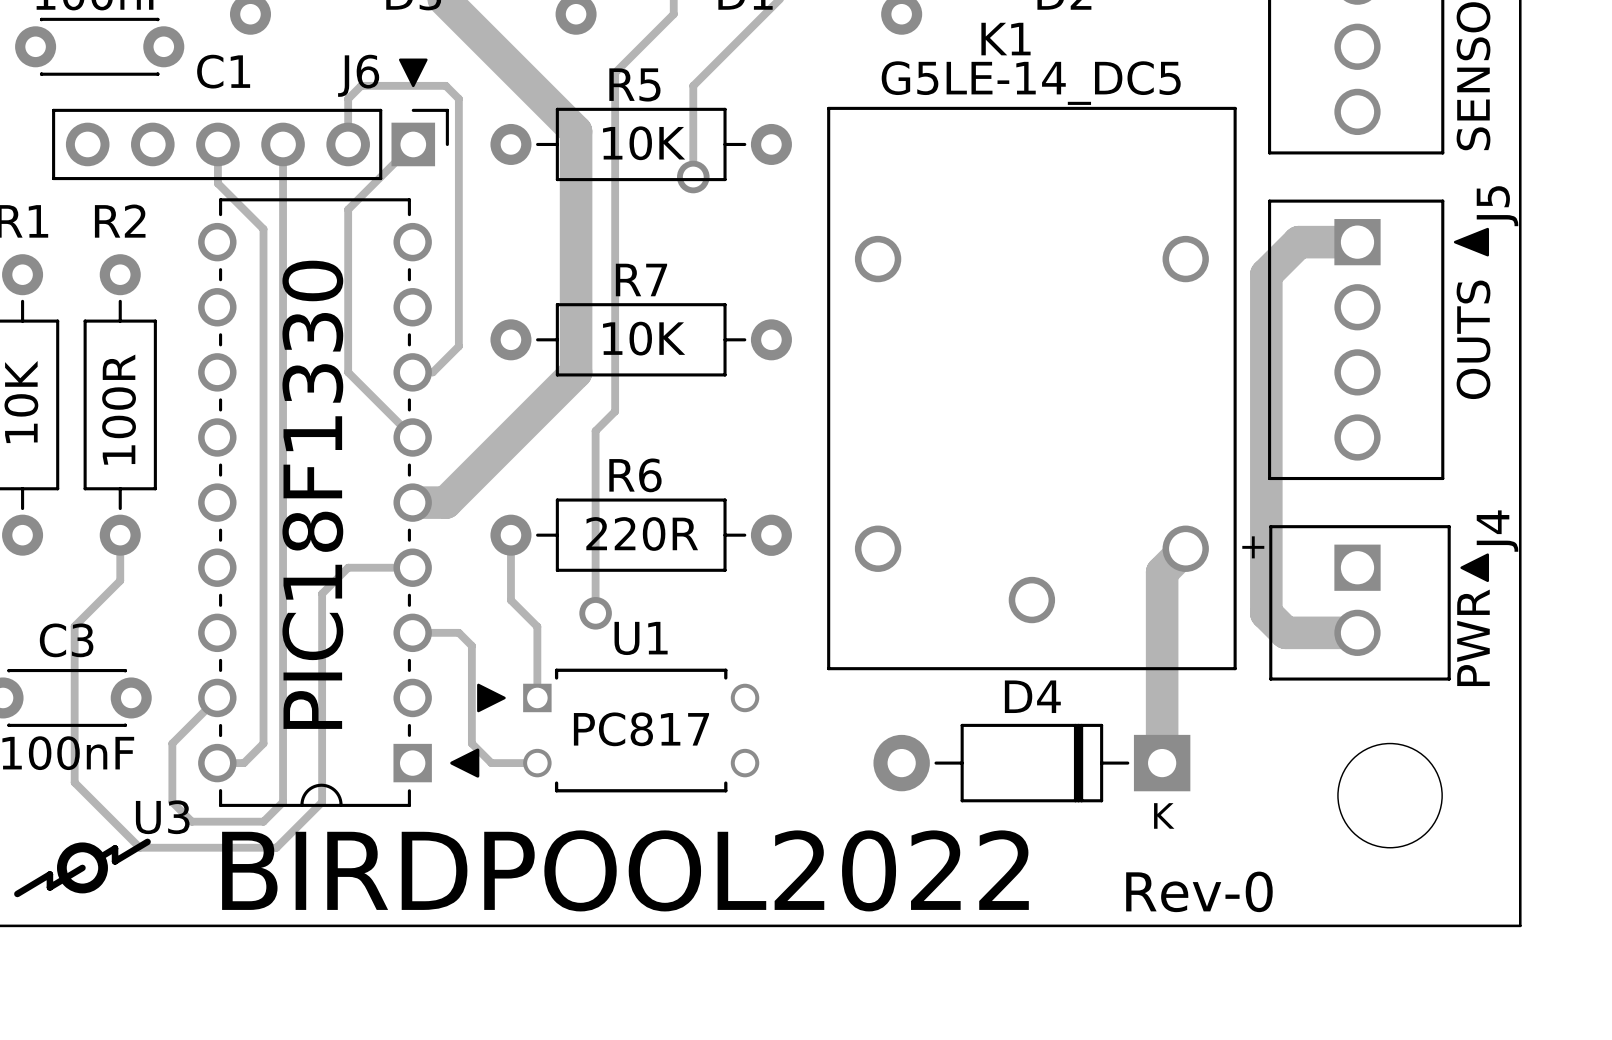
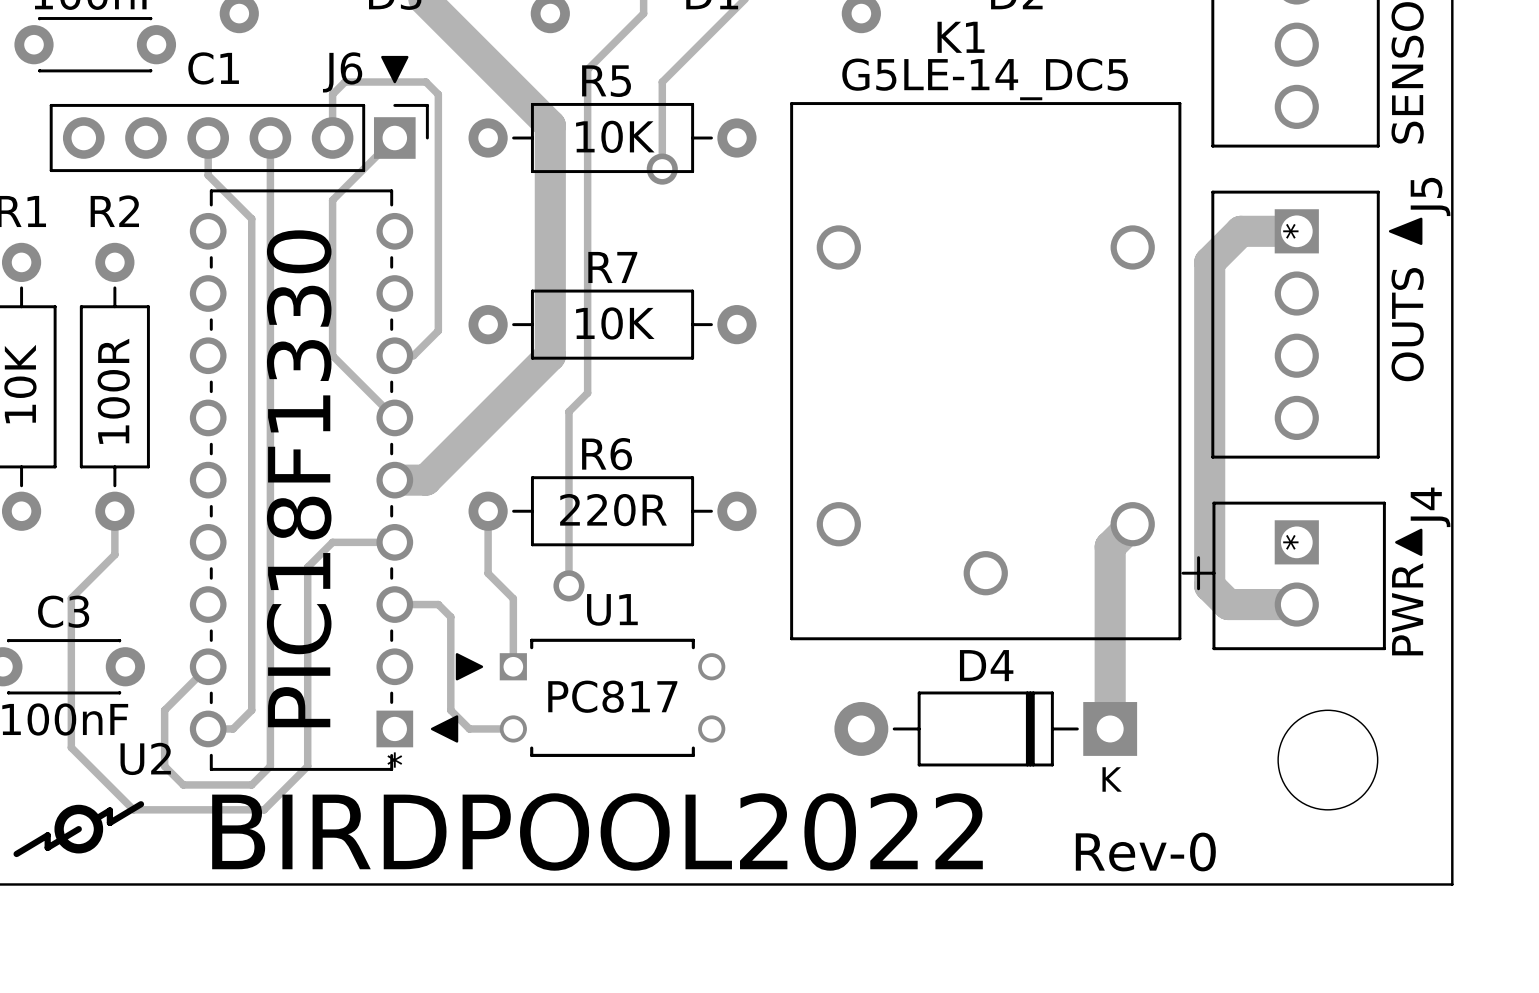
K1 footprint: [827, 106, 1237, 671] -> [790, 102, 1216, 641]
J5 text: none -> * (1290, 231)
U3: PIC18F1330 (338, 502) -> none
U2: none -> PIC18F1330 (324, 480)
J4 text: none -> * (1290, 542)

